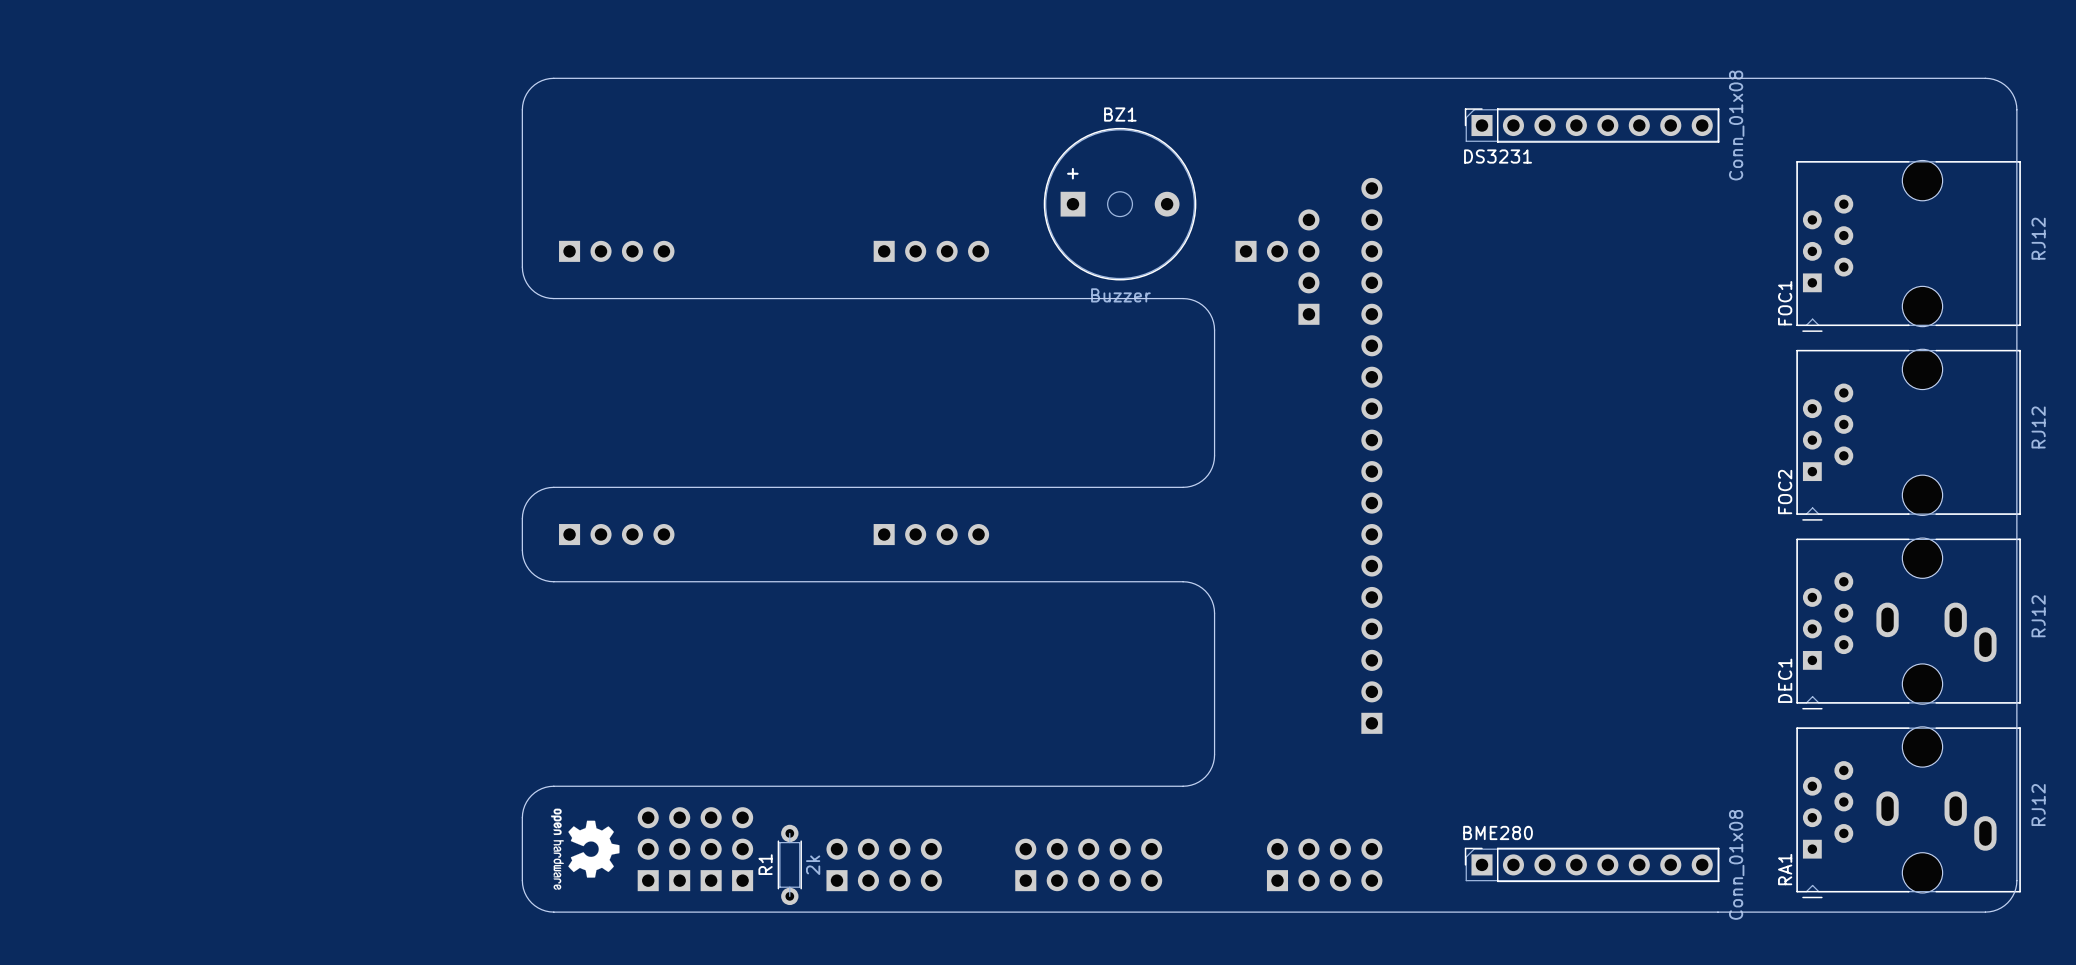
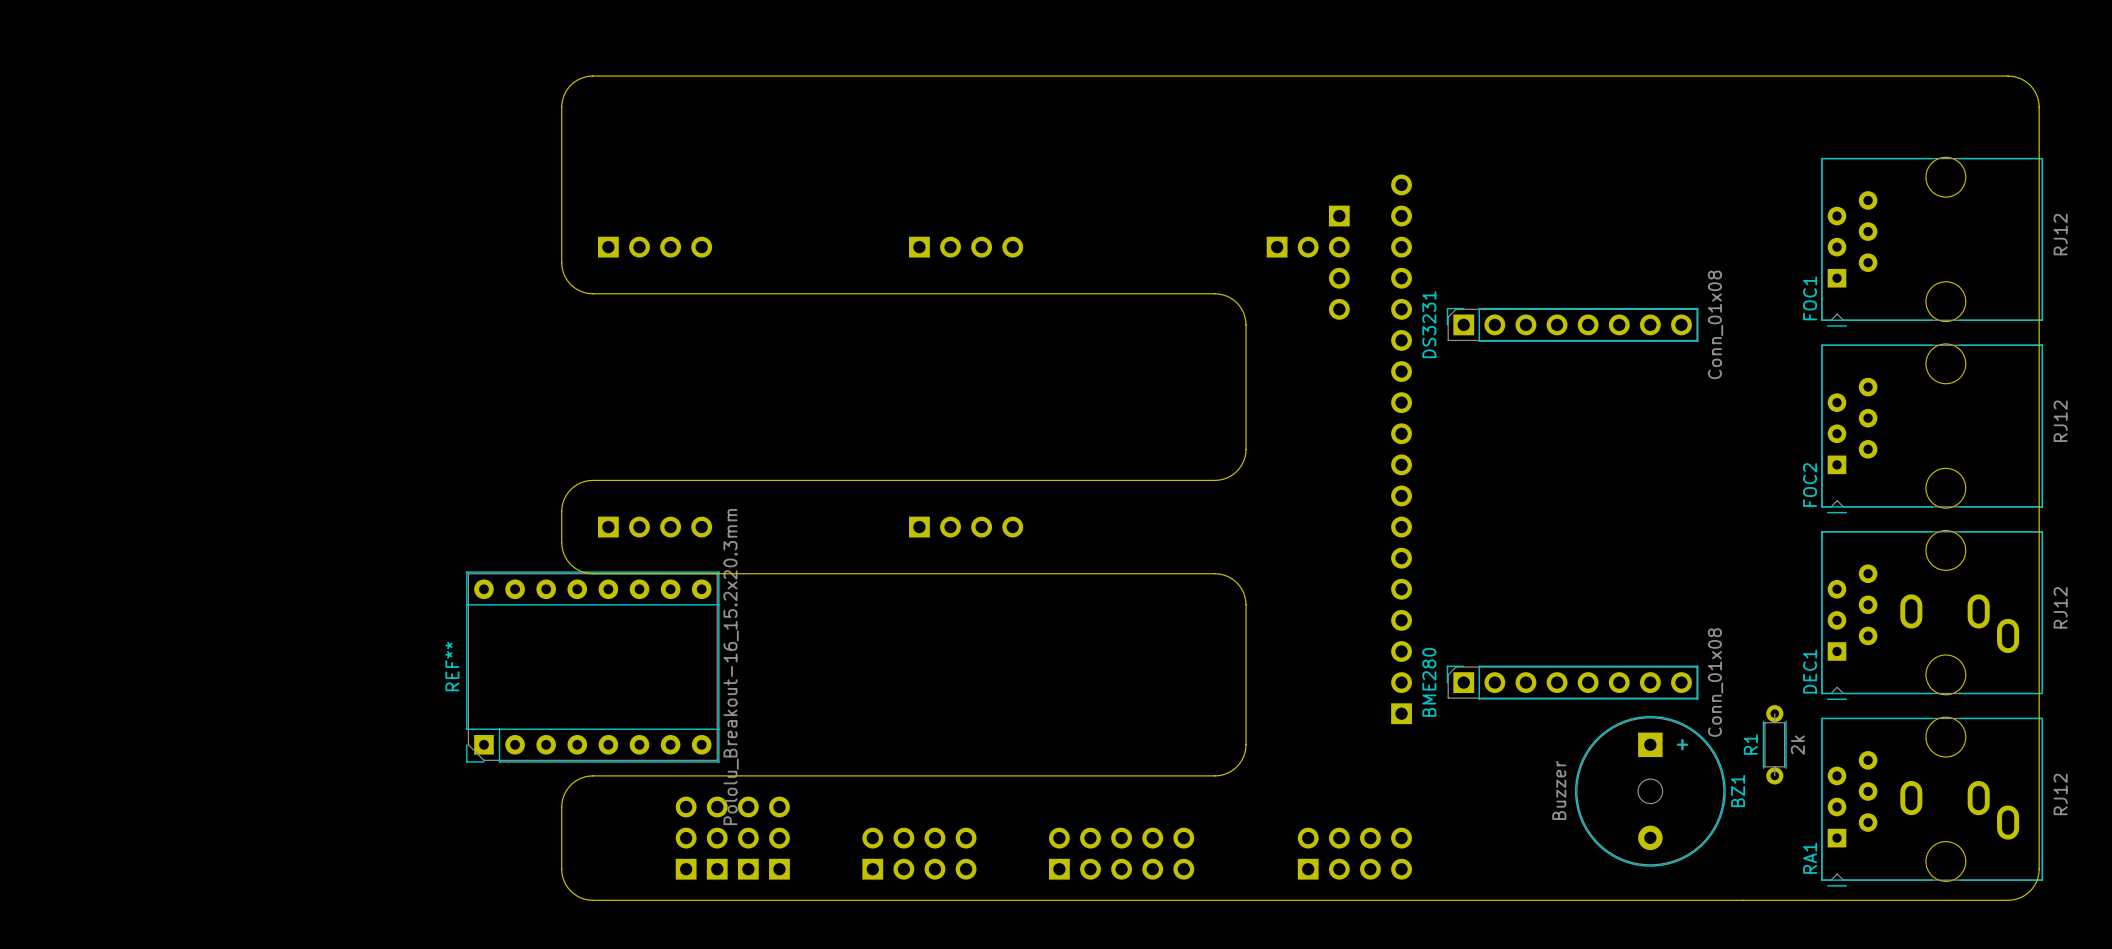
DS3231 position: (1592, 125) -> (1572, 324)
DS3231 name rotation: 0° (1498, 156) -> 90° counterclockwise (1429, 324)
BZ1 rotation: 0° (1120, 204) -> 90° clockwise (1650, 791)
BZ1 position: (1120, 204) -> (1650, 791)
part rotation: 0° (1308, 267) -> 180° (1339, 262)
REF**: none -> Pololu_Breakout-16_15.2x20.3mm (592, 667)
drawing: [550, 808, 620, 890] -> none
BME280 name rotation: 0° (1498, 832) -> 90° counterclockwise (1429, 682)
R1 position: (789, 864) -> (1774, 744)
BME280 position: (1592, 864) -> (1572, 682)

